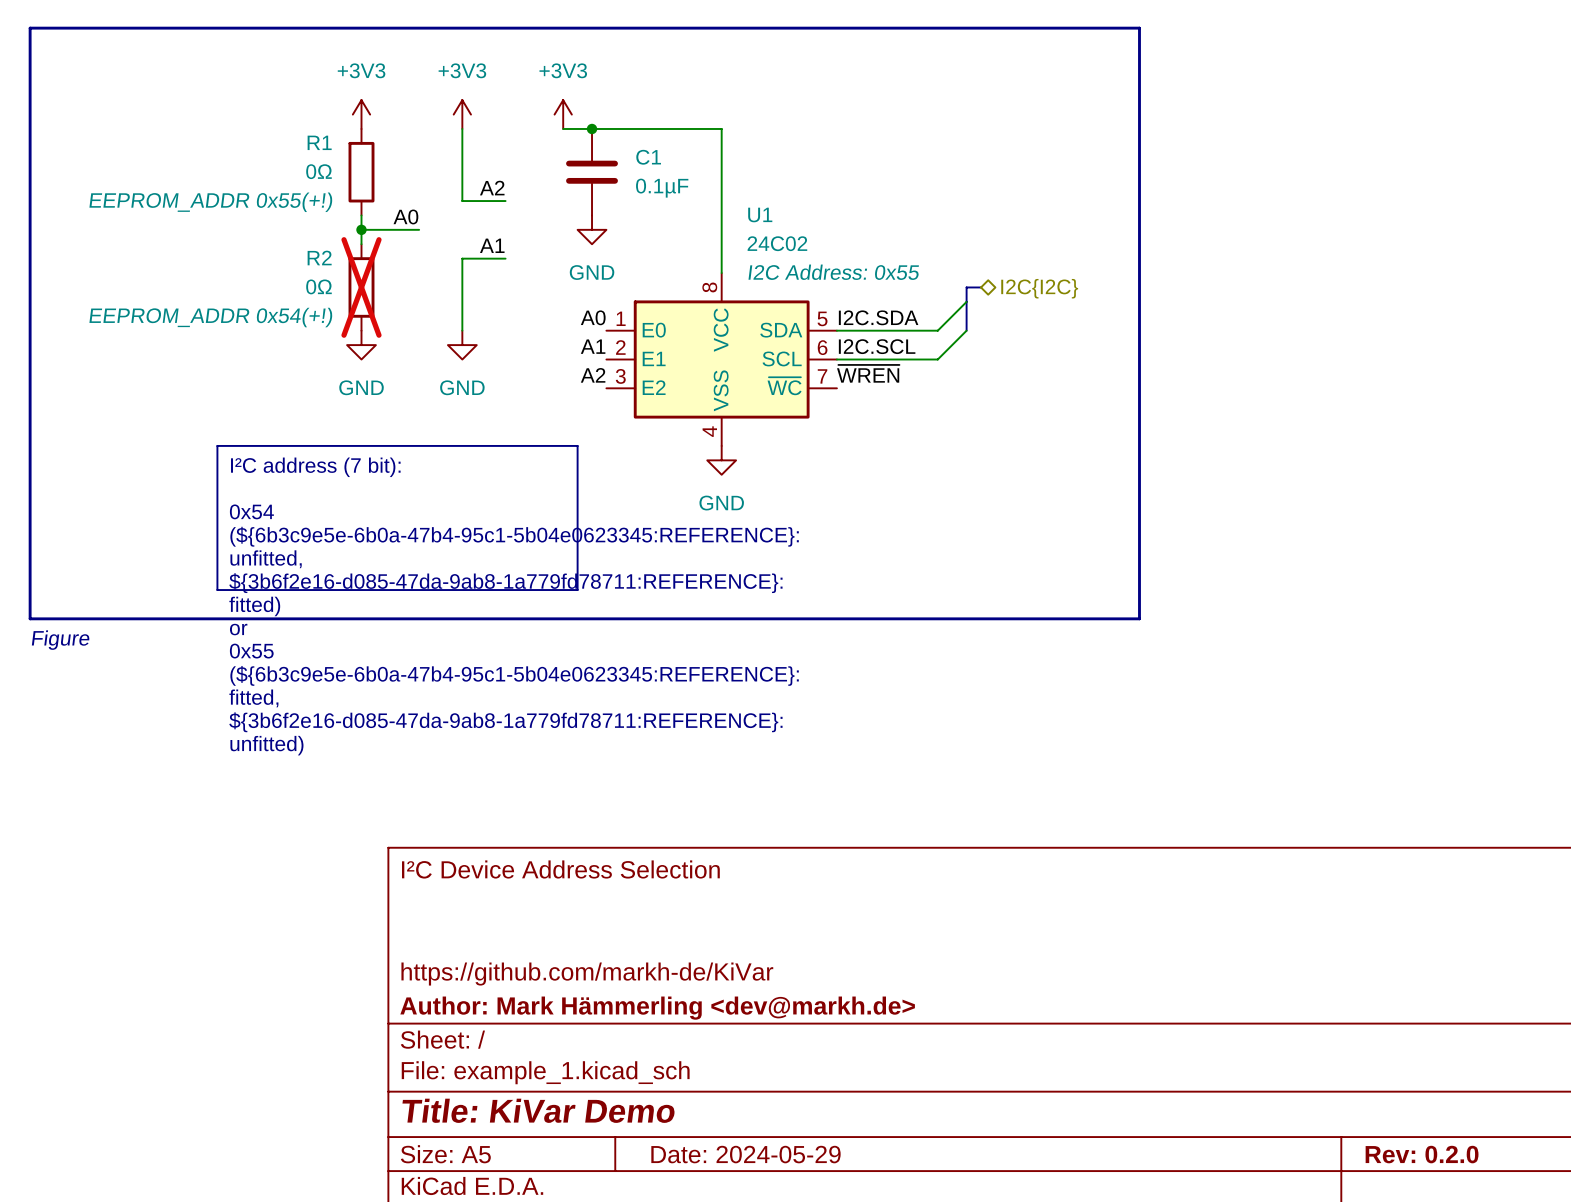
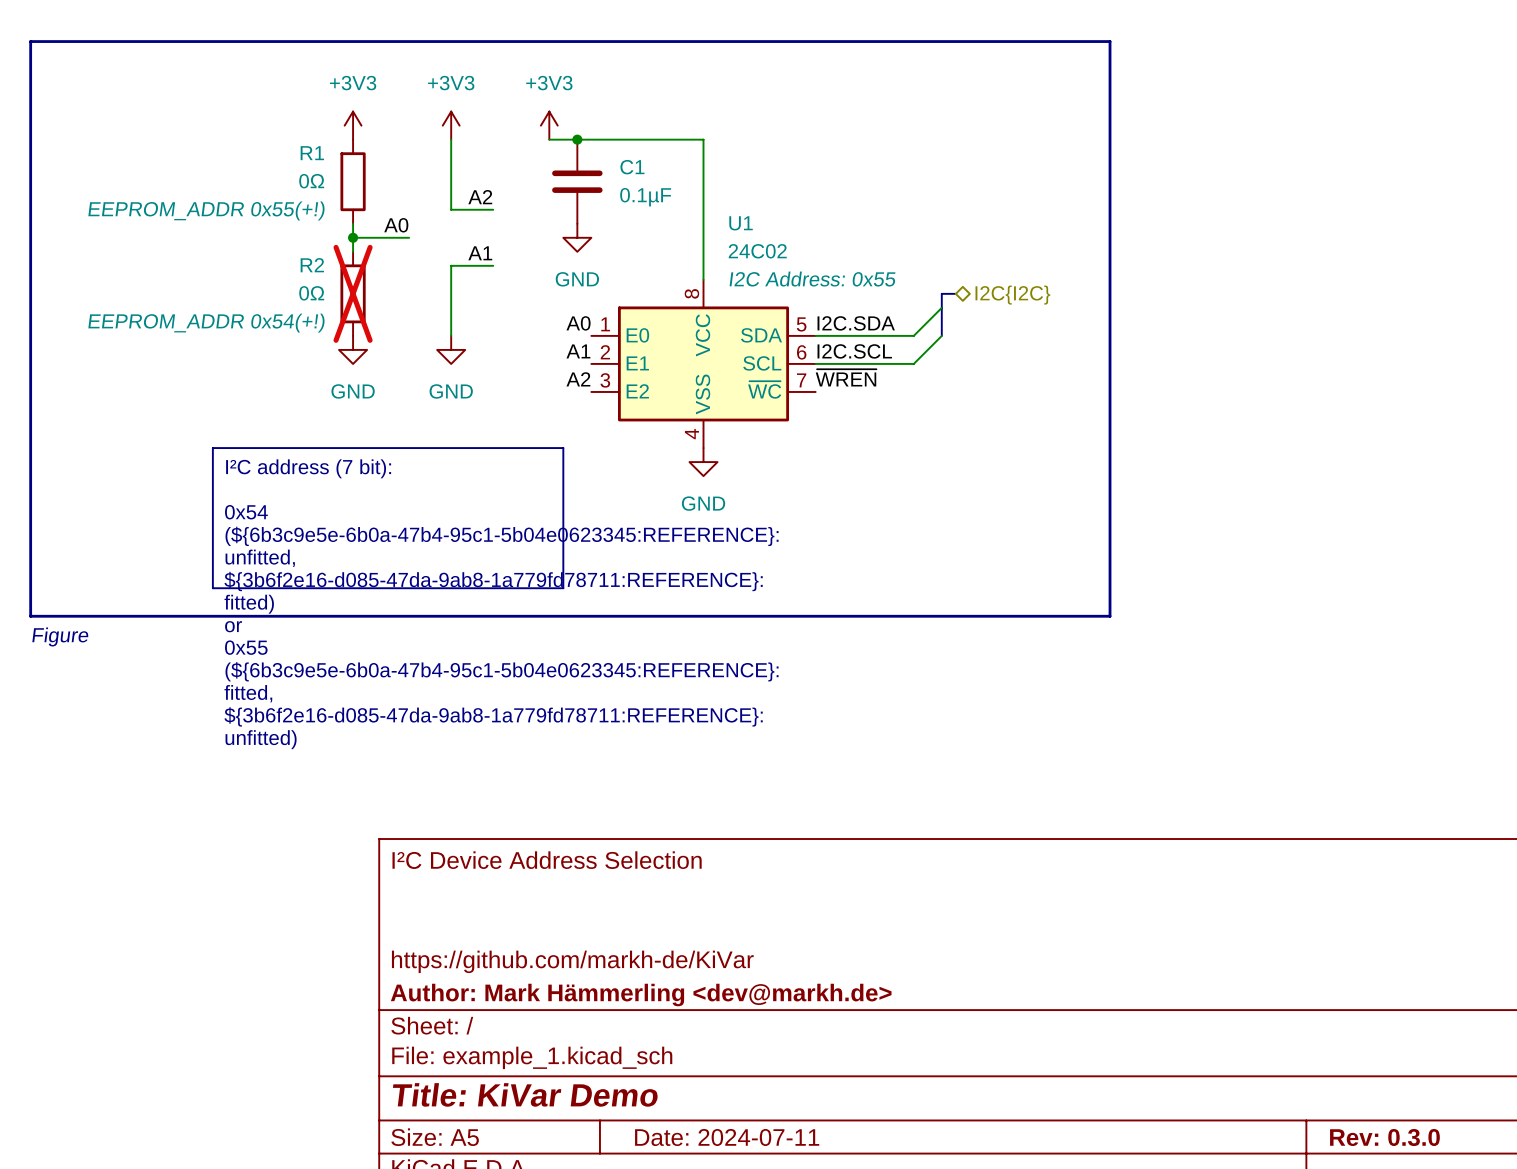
title block: Date: 2024-05-29 (745, 1154) -> Date: 2024-07-11 (727, 1137)
title block: Rev: 0.2.0 (1422, 1154) -> Rev: 0.3.0 (1384, 1137)

